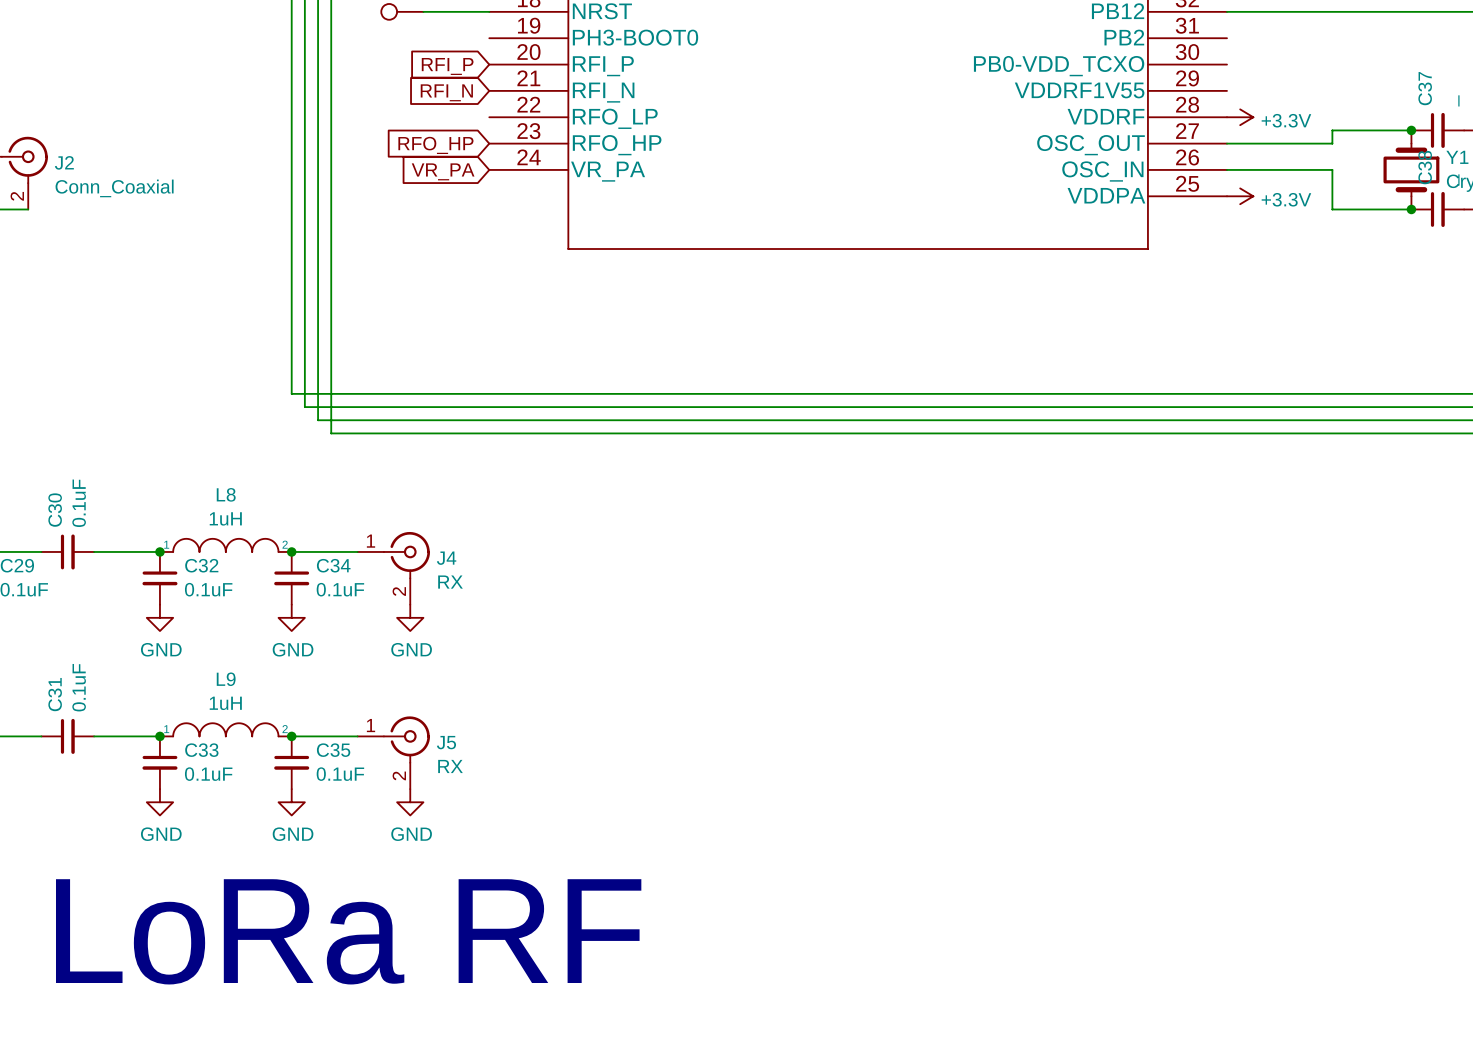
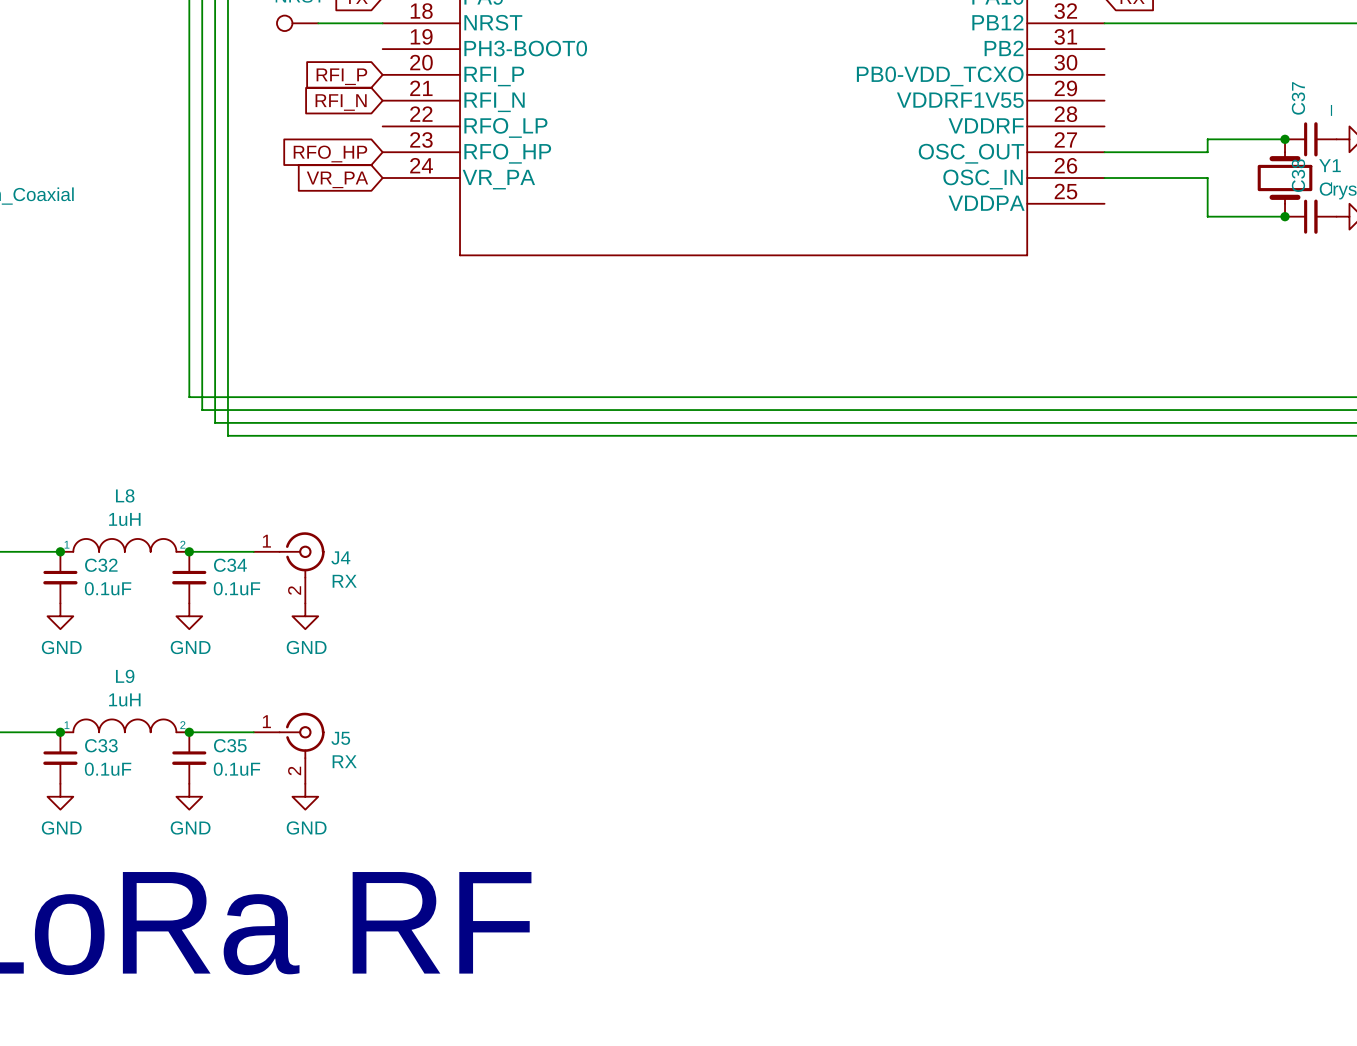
power symbol: +3.3V (1240, 117) -> none
power symbol: +3.3V (1240, 196) -> none

